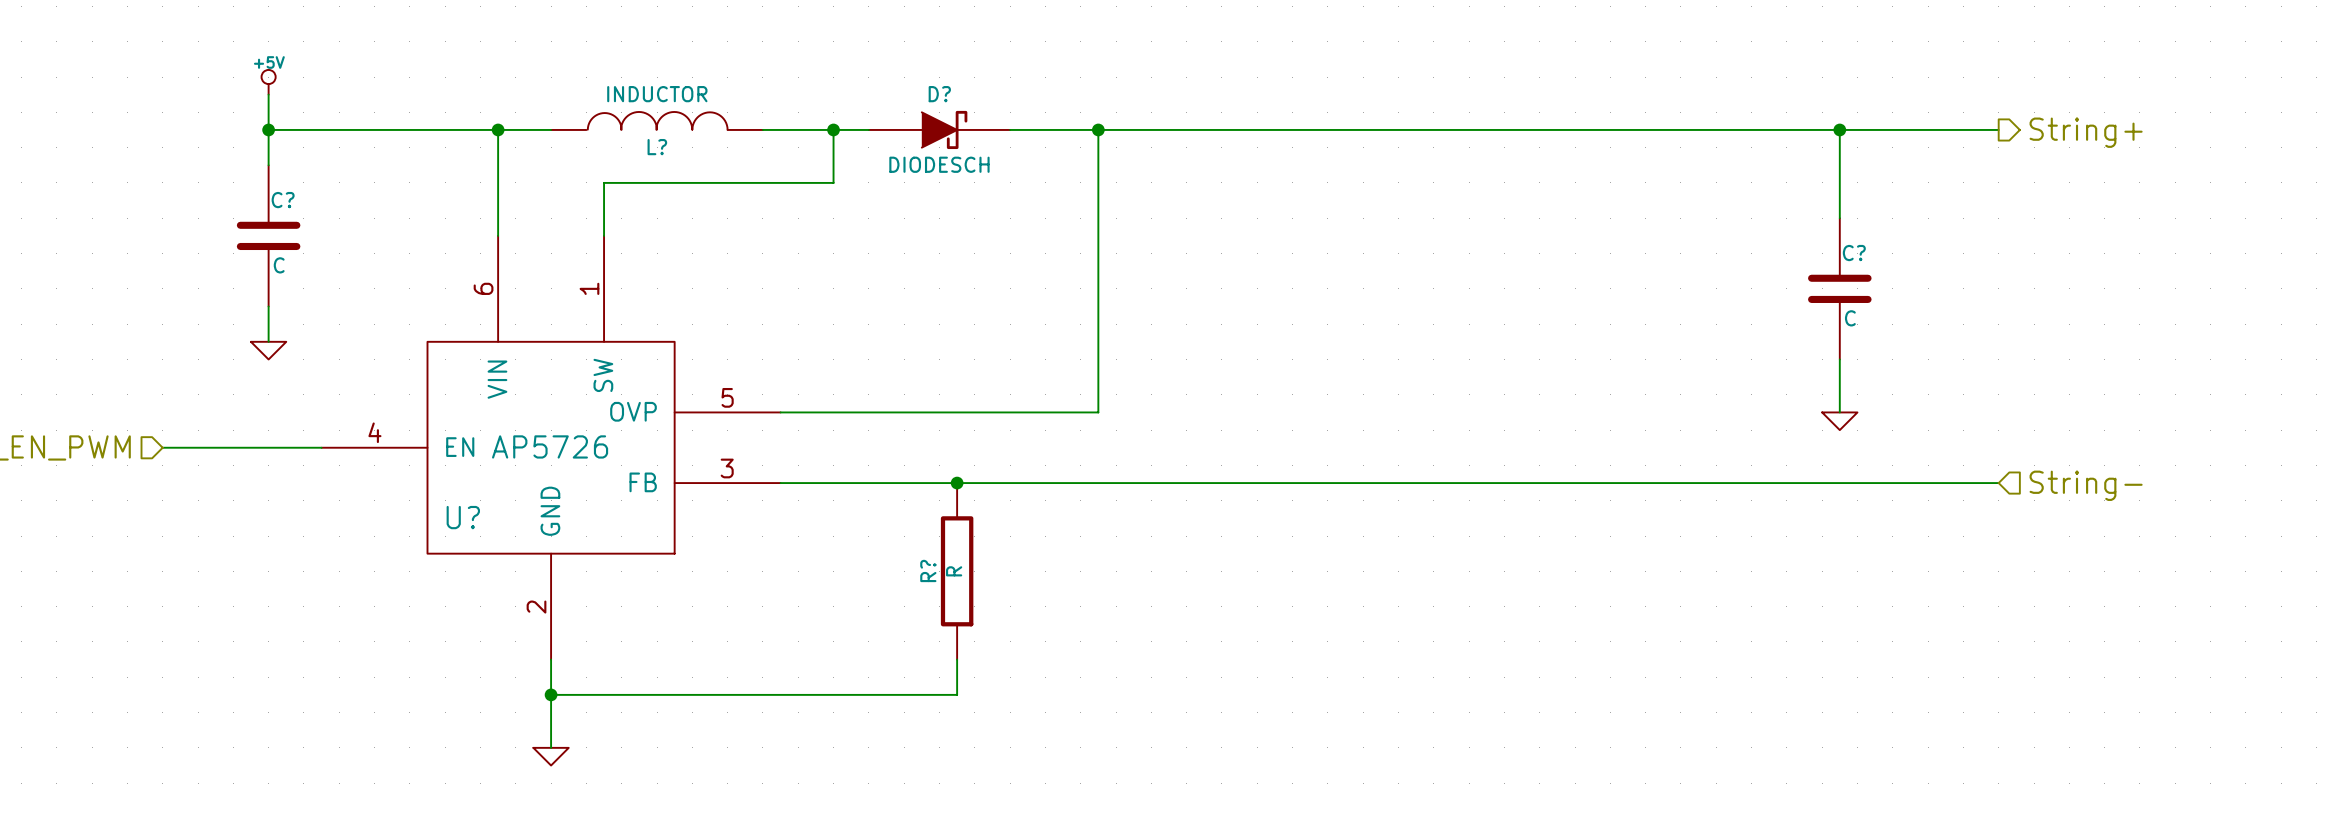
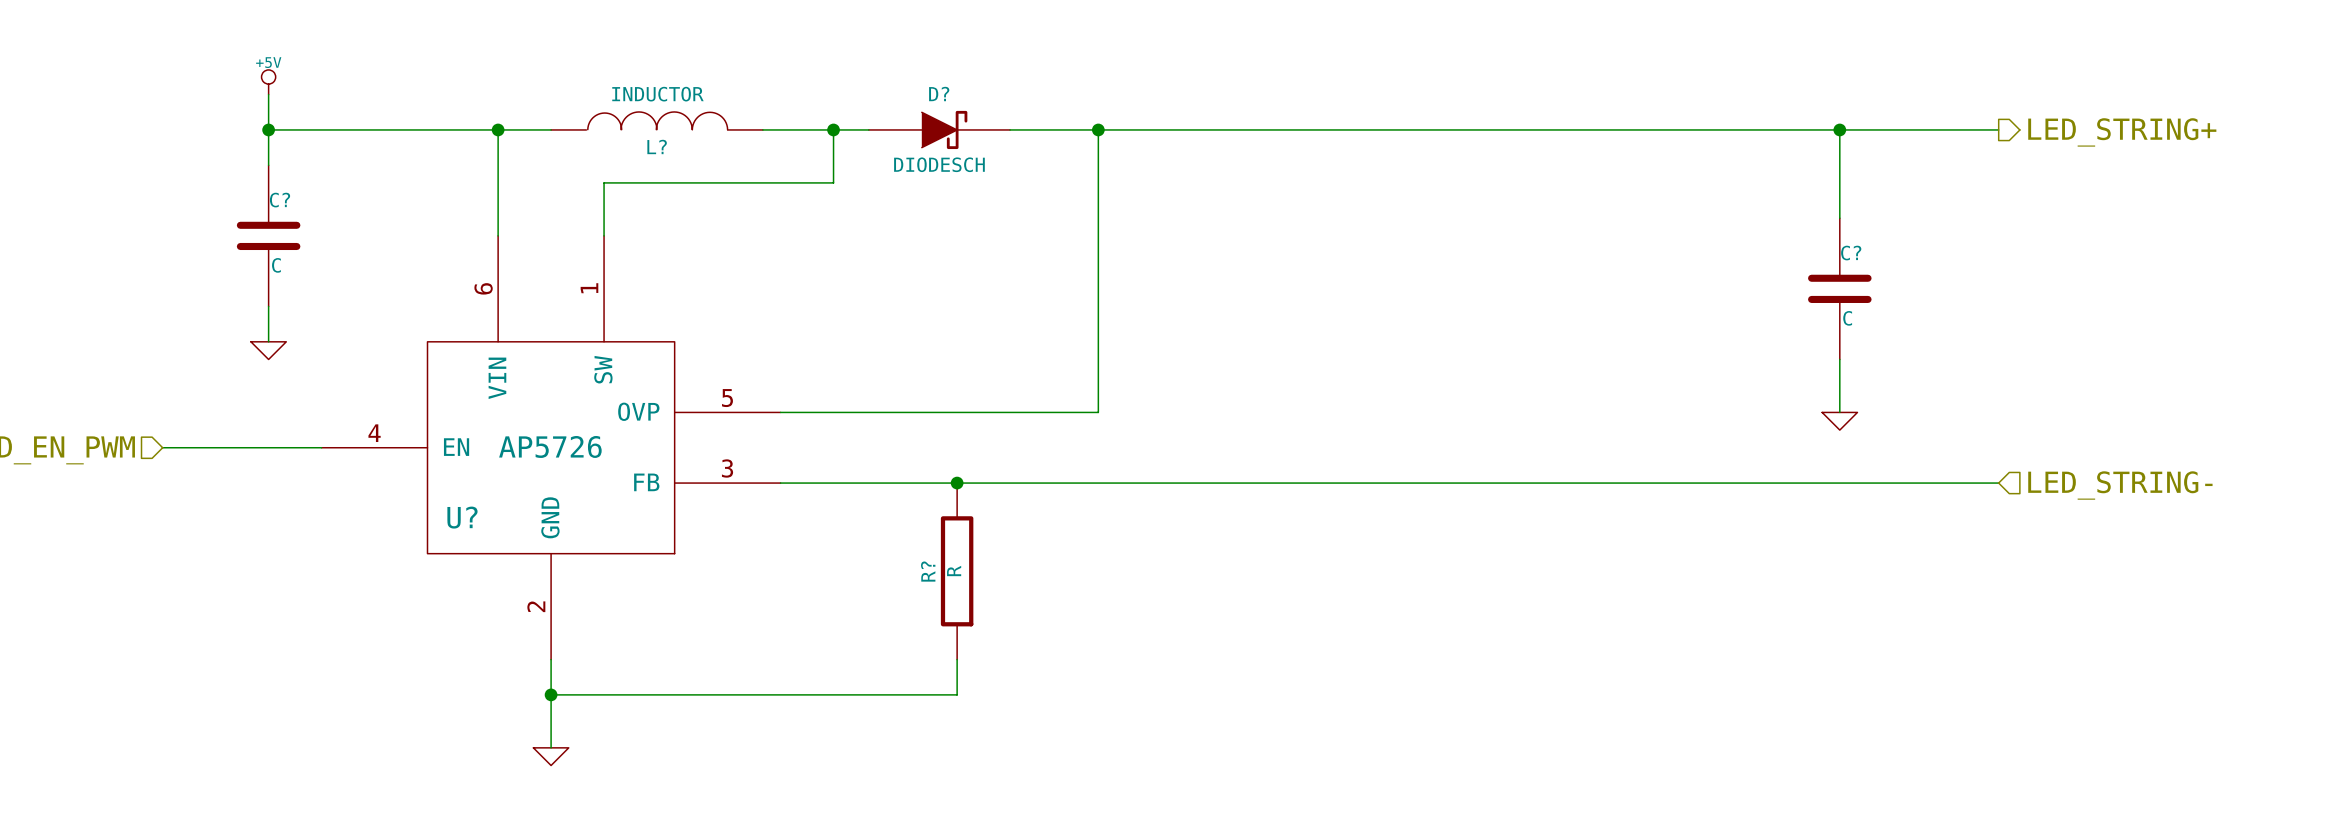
hierarchical label: String+ (2086, 132) -> LED_STRING+ (2122, 132)
hierarchical label: String- (2086, 485) -> LED_STRING- (2120, 485)

